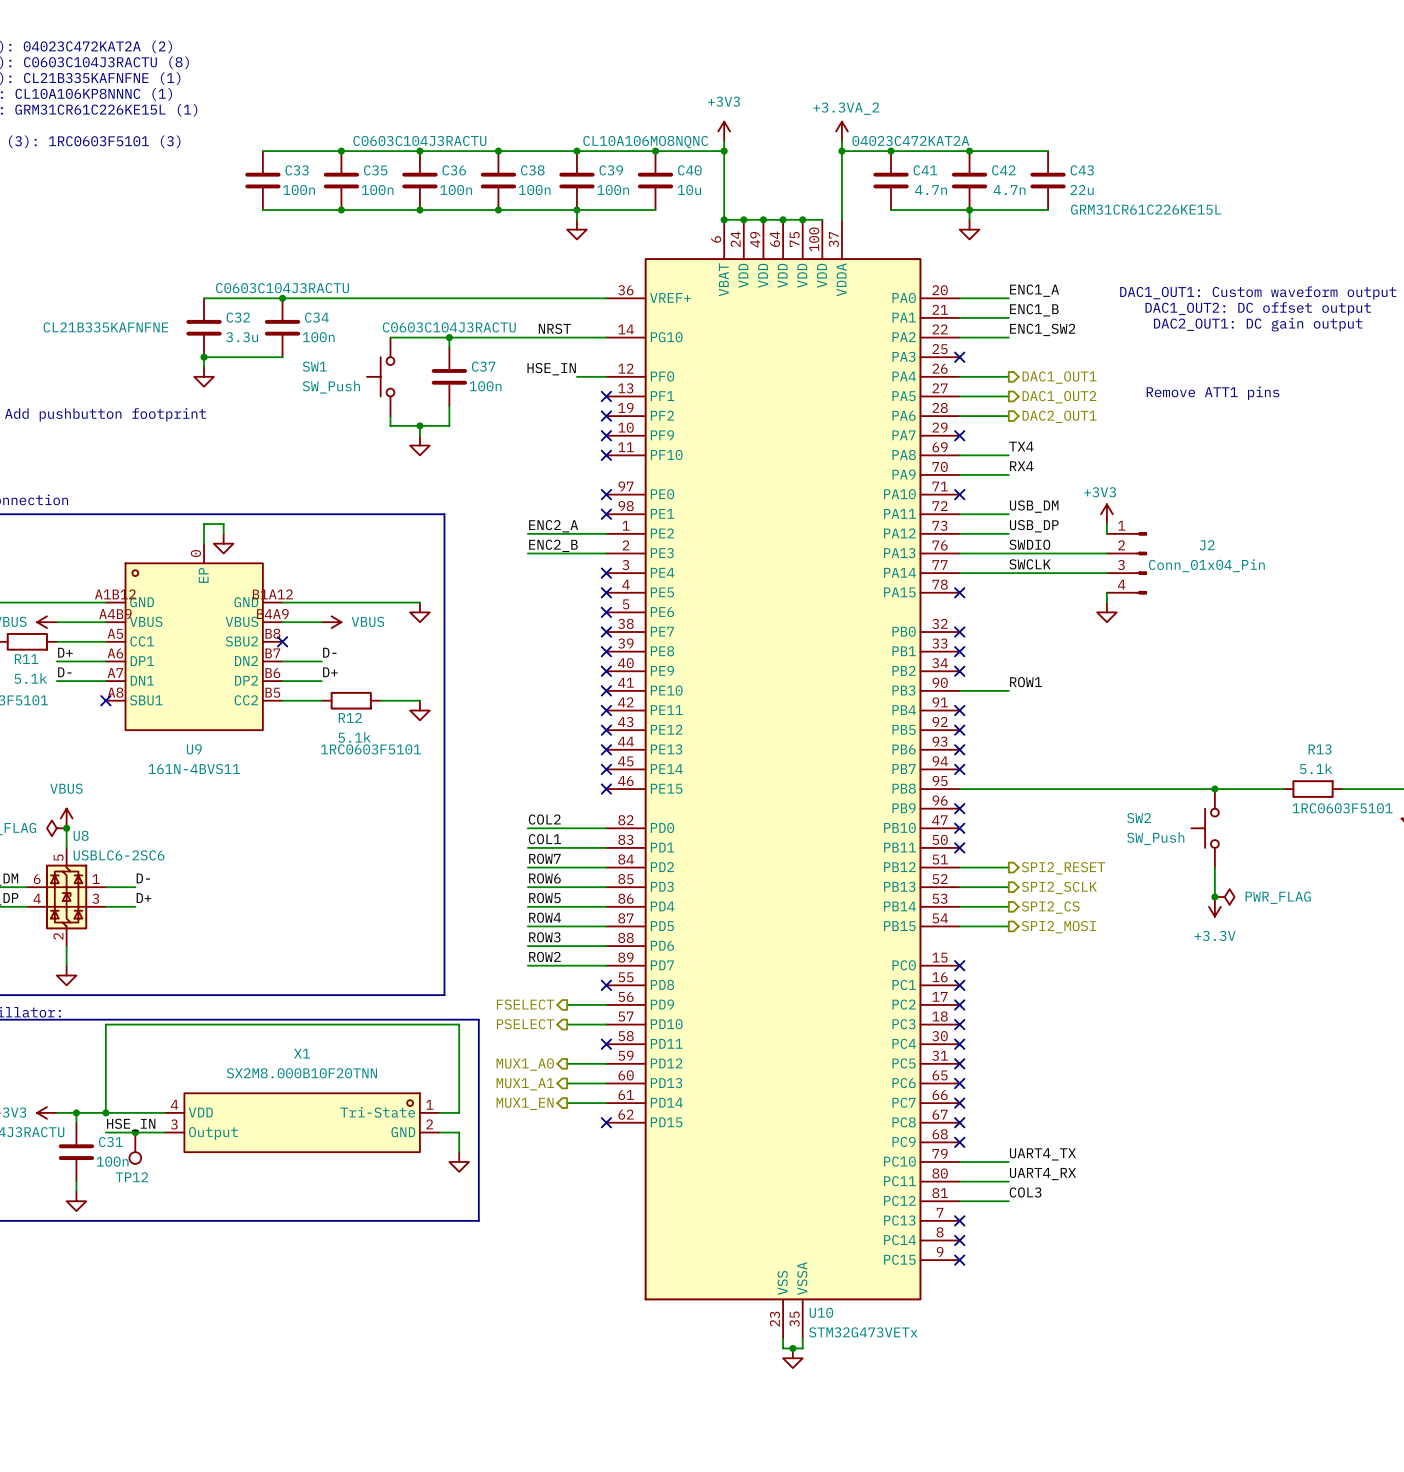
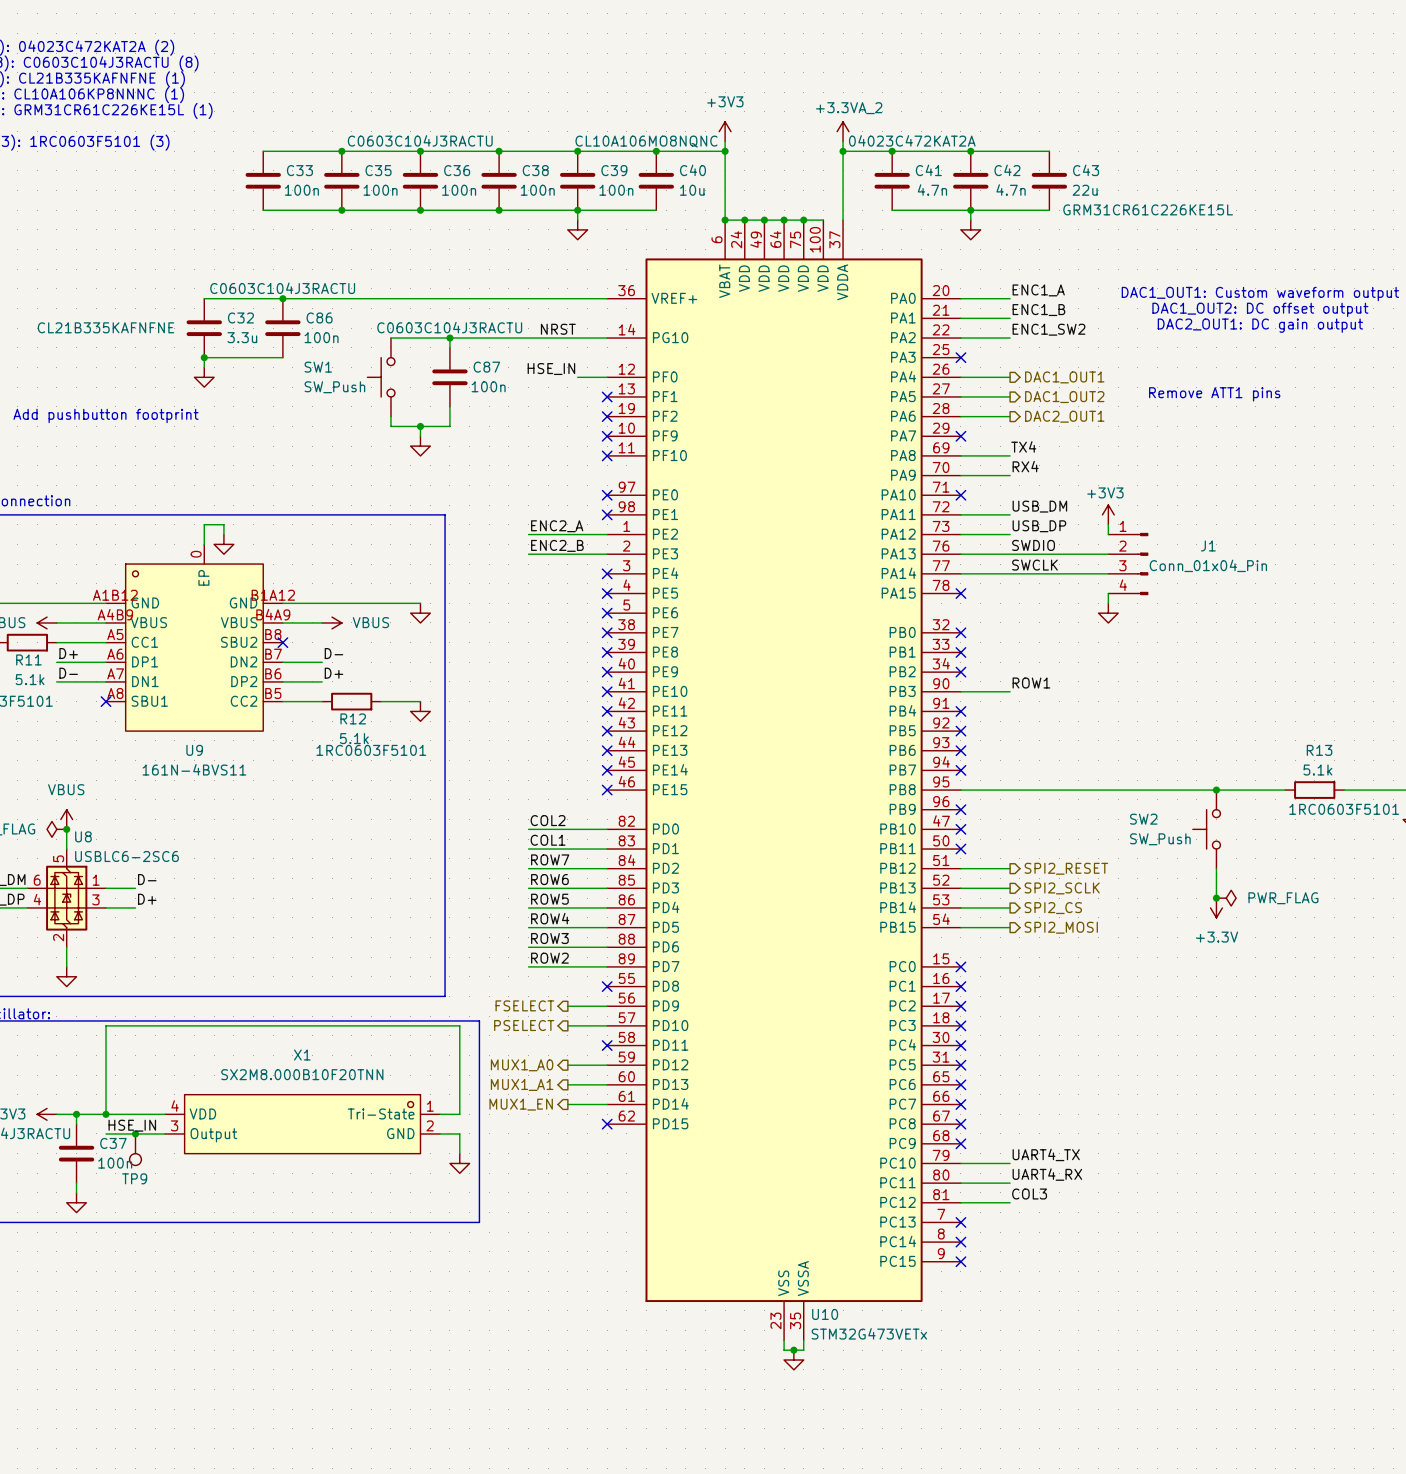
C34 name: C34 (317, 317) -> C86 (319, 317)
C37 name: C37 (483, 366) -> C87 (486, 367)
J2 name: J2 (1207, 545) -> J1 (1208, 545)
C31 name: C31 (110, 1141) -> C37 (113, 1143)
TP12 name: TP12 (131, 1177) -> TP9 (134, 1178)

